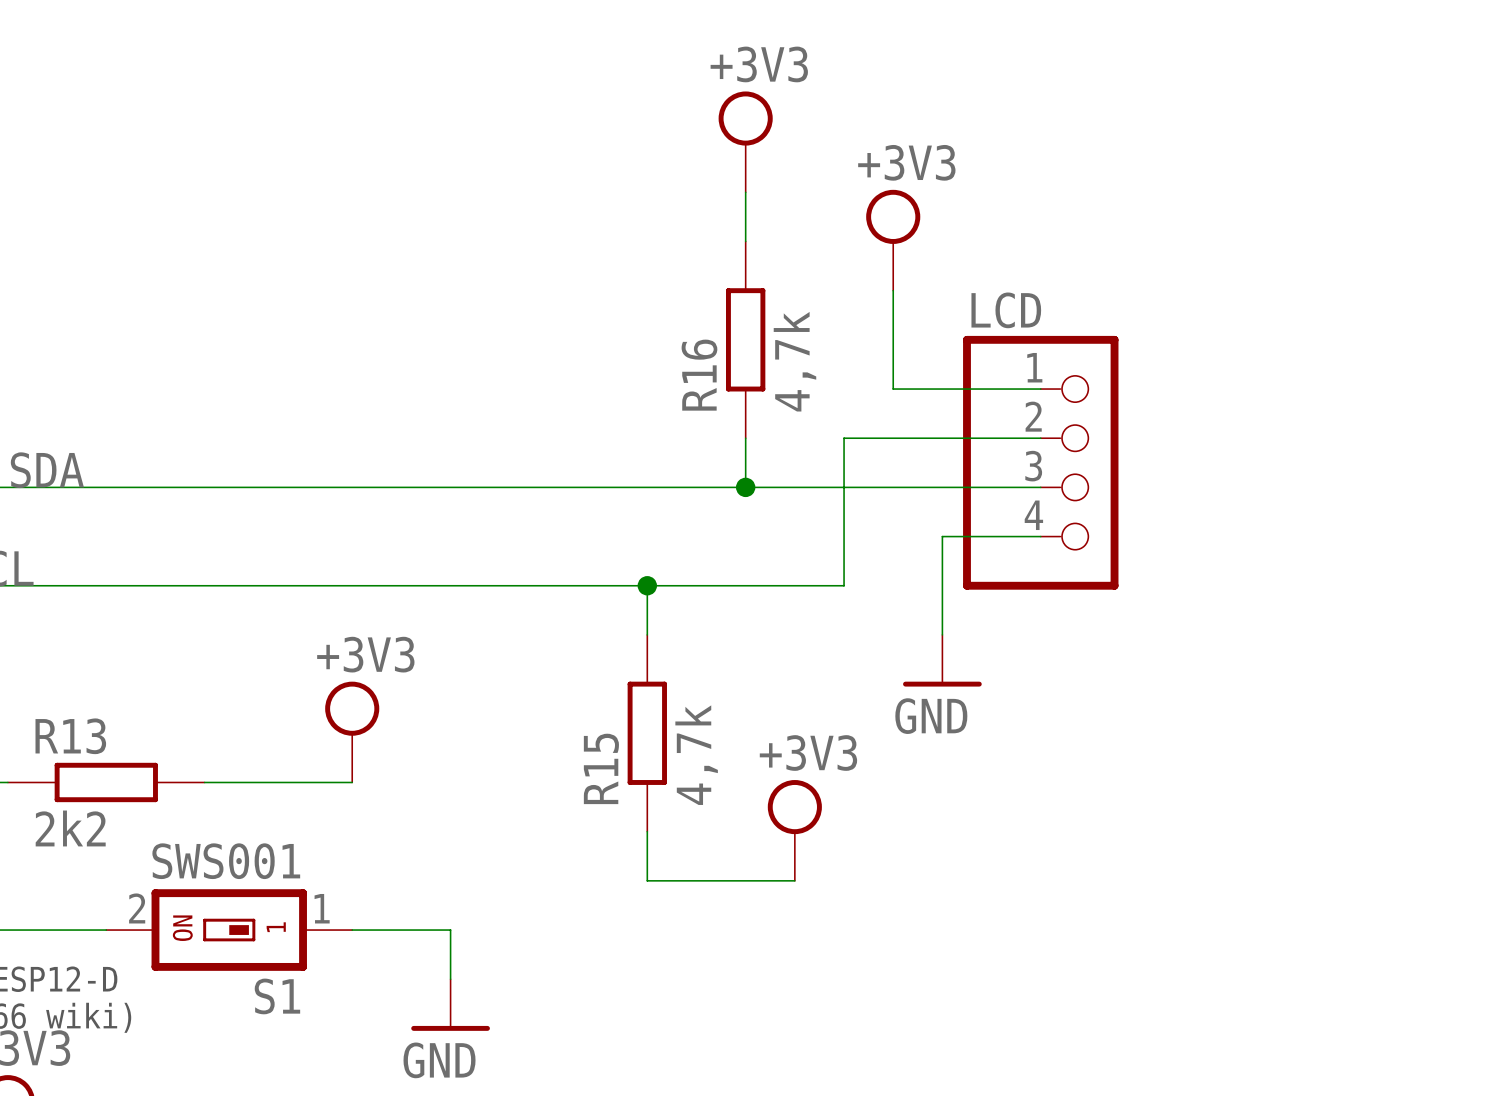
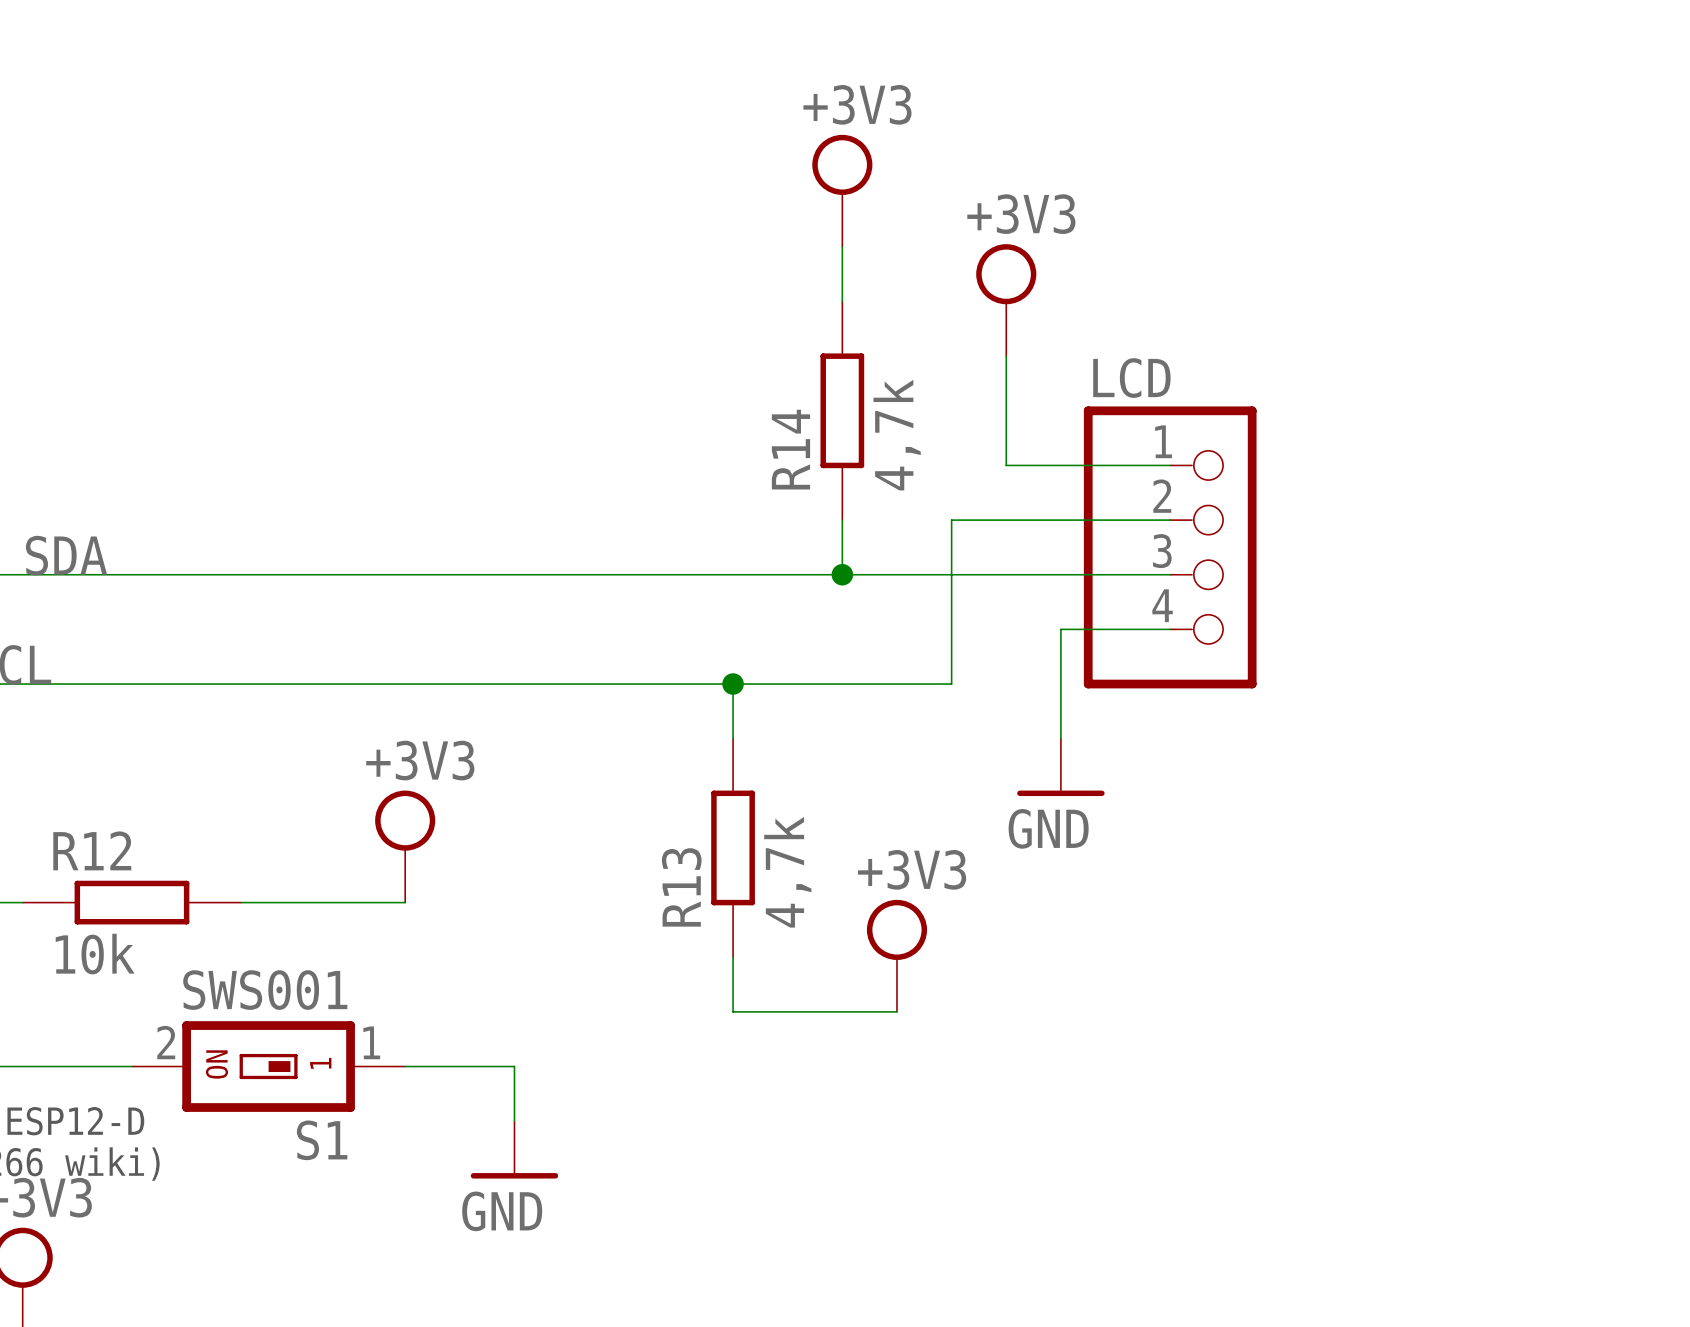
R16 name: R16 (699, 375) -> R14 (790, 449)
R13 name: R13 (70, 736) -> R12 (92, 850)
R15 name: R15 (601, 768) -> R13 (681, 887)
R13 value: 2k2 (70, 828) -> 10k (95, 954)

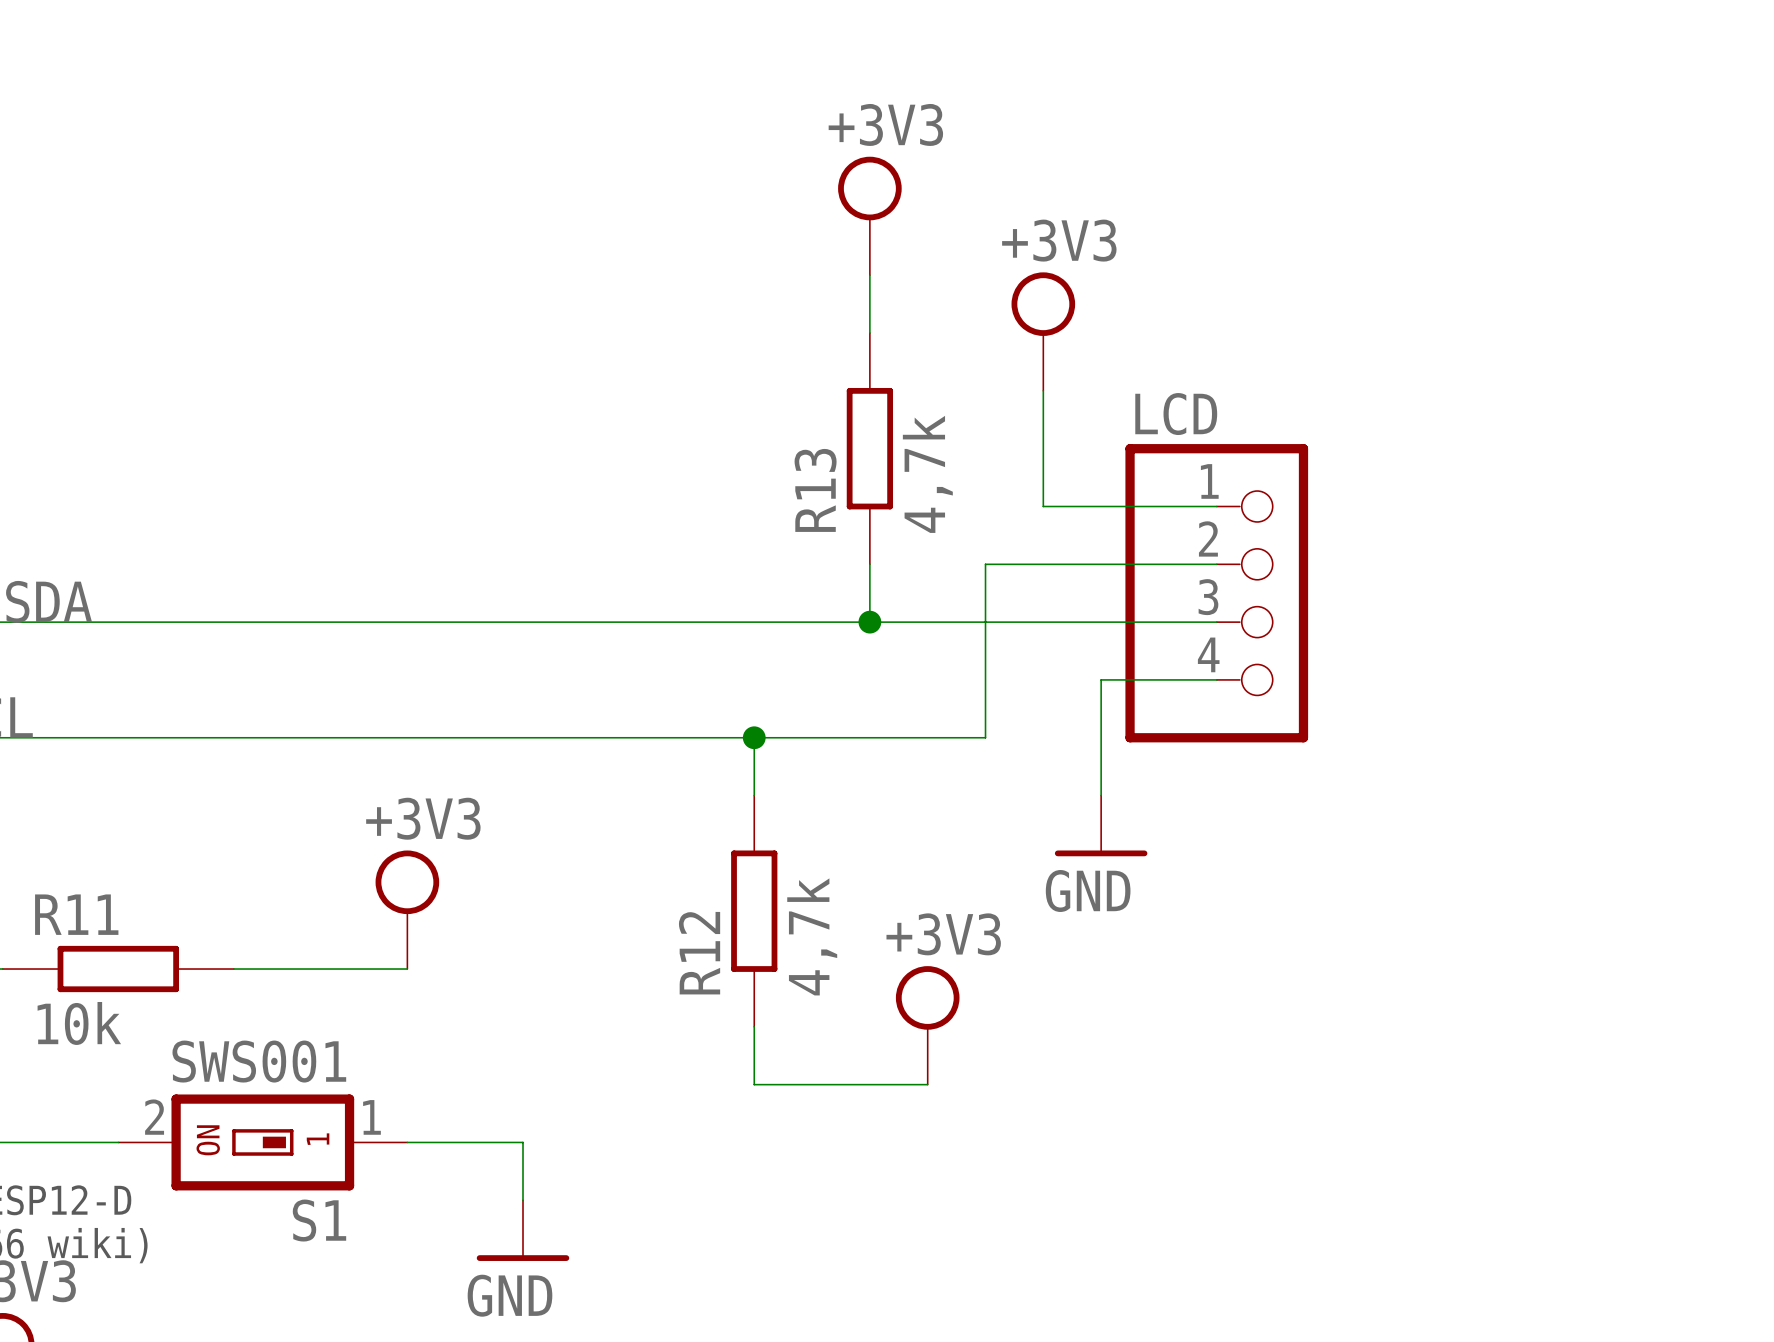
R14 name: R14 (790, 449) -> R13 (815, 490)
R12 name: R12 (92, 850) -> R11 (76, 914)
R13 name: R13 (681, 887) -> R12 (699, 953)

